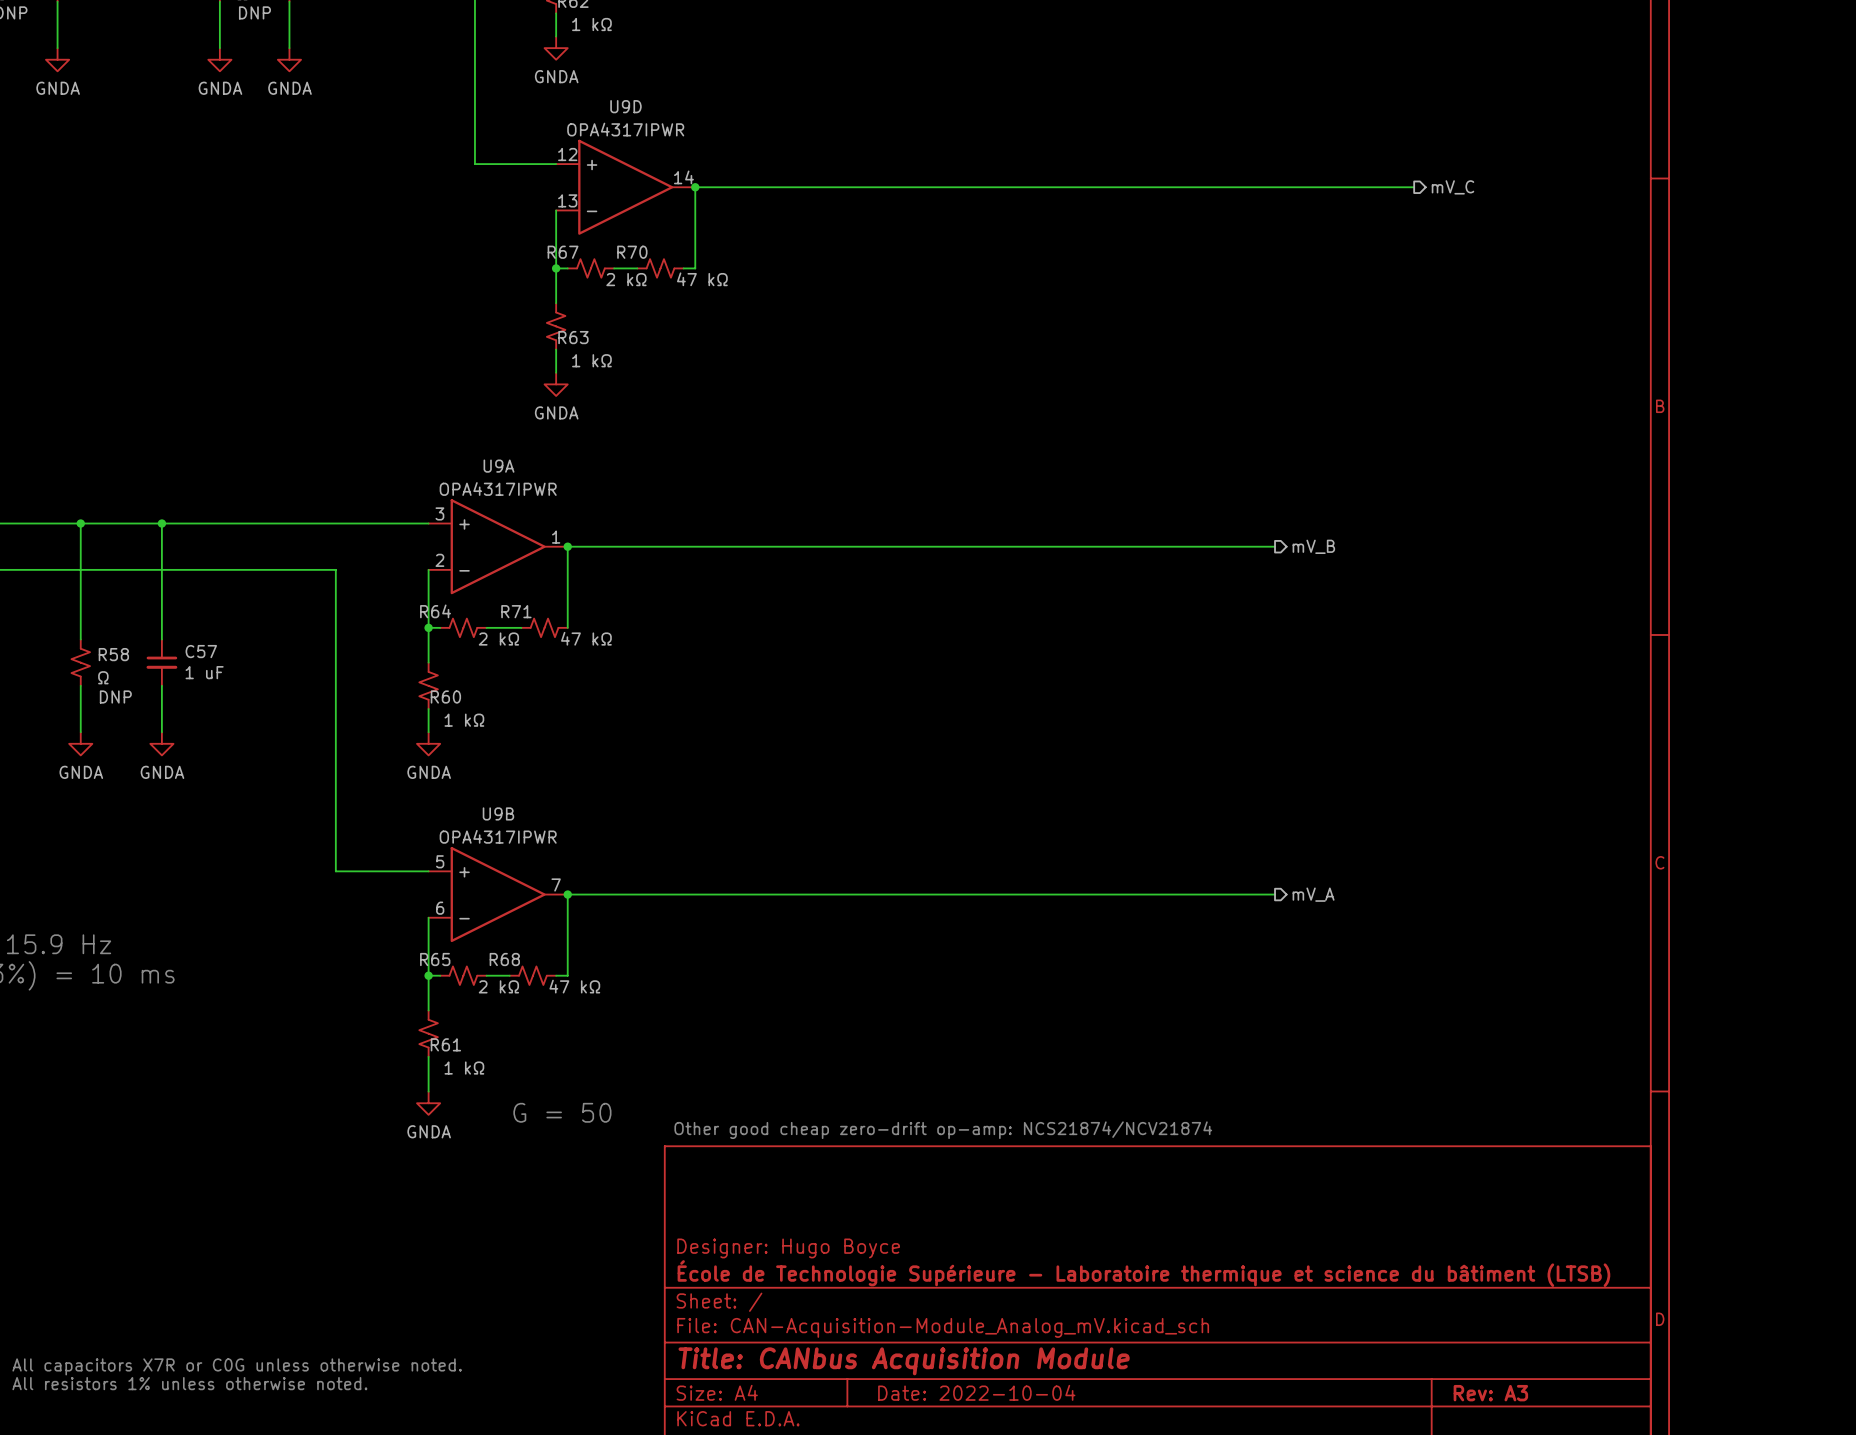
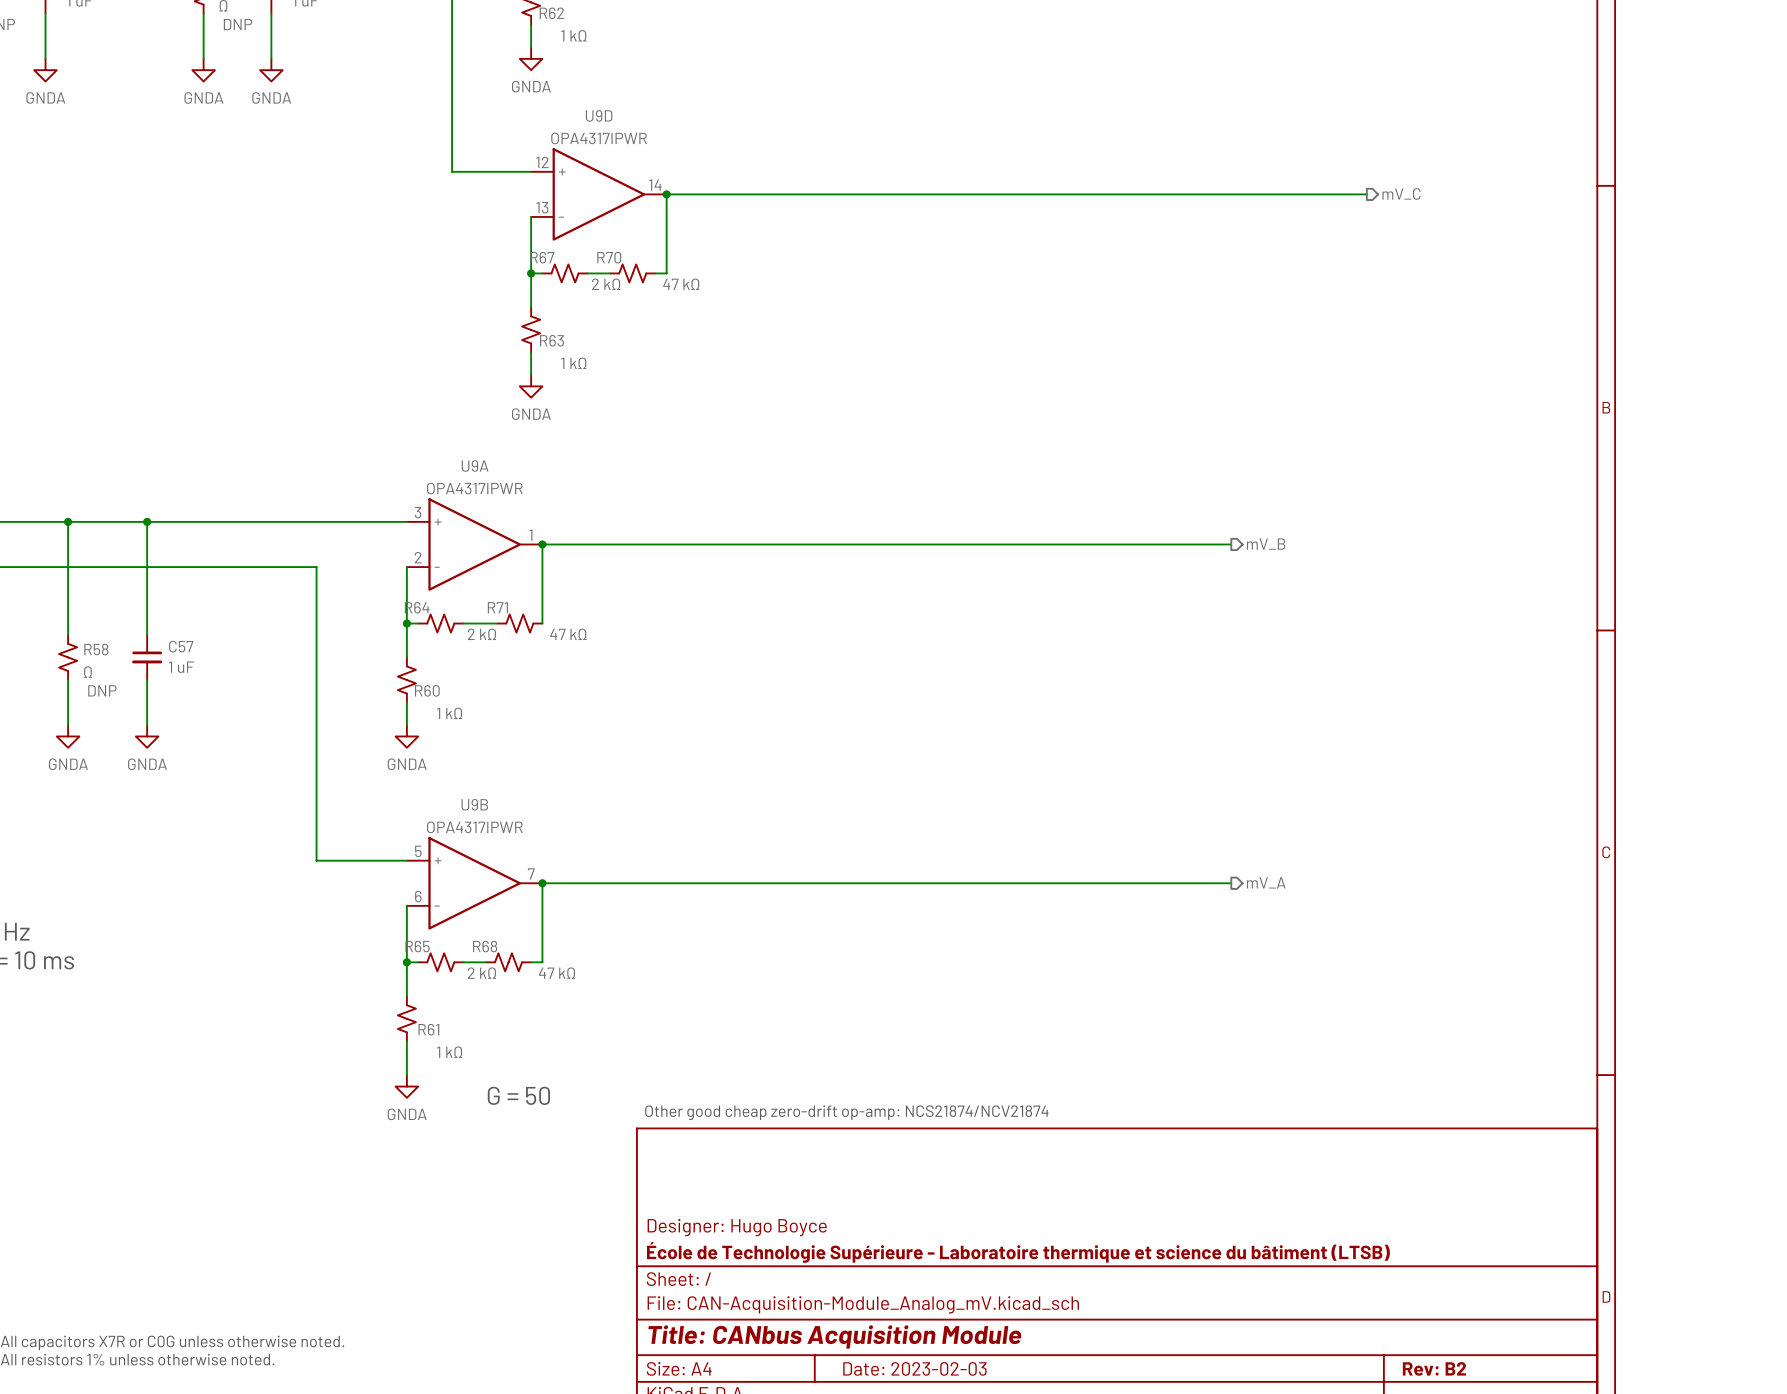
title block: Date: 2022-10-04 (976, 1392) -> Date: 2023-02-03 (914, 1368)
title block: Rev: A3 (1490, 1393) -> Rev: B2 (1434, 1368)

